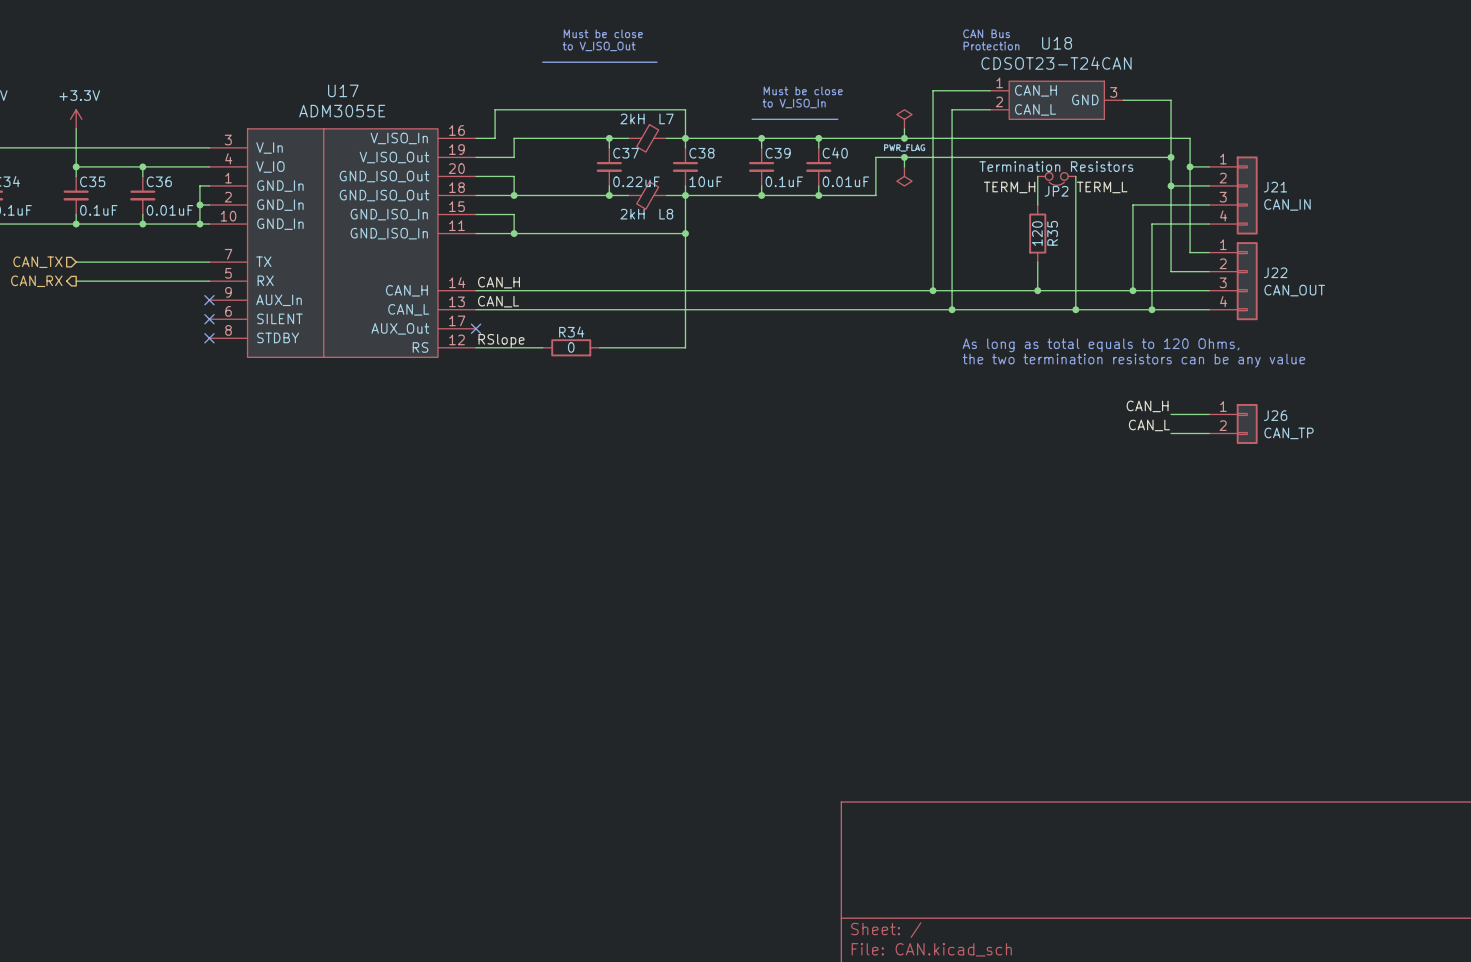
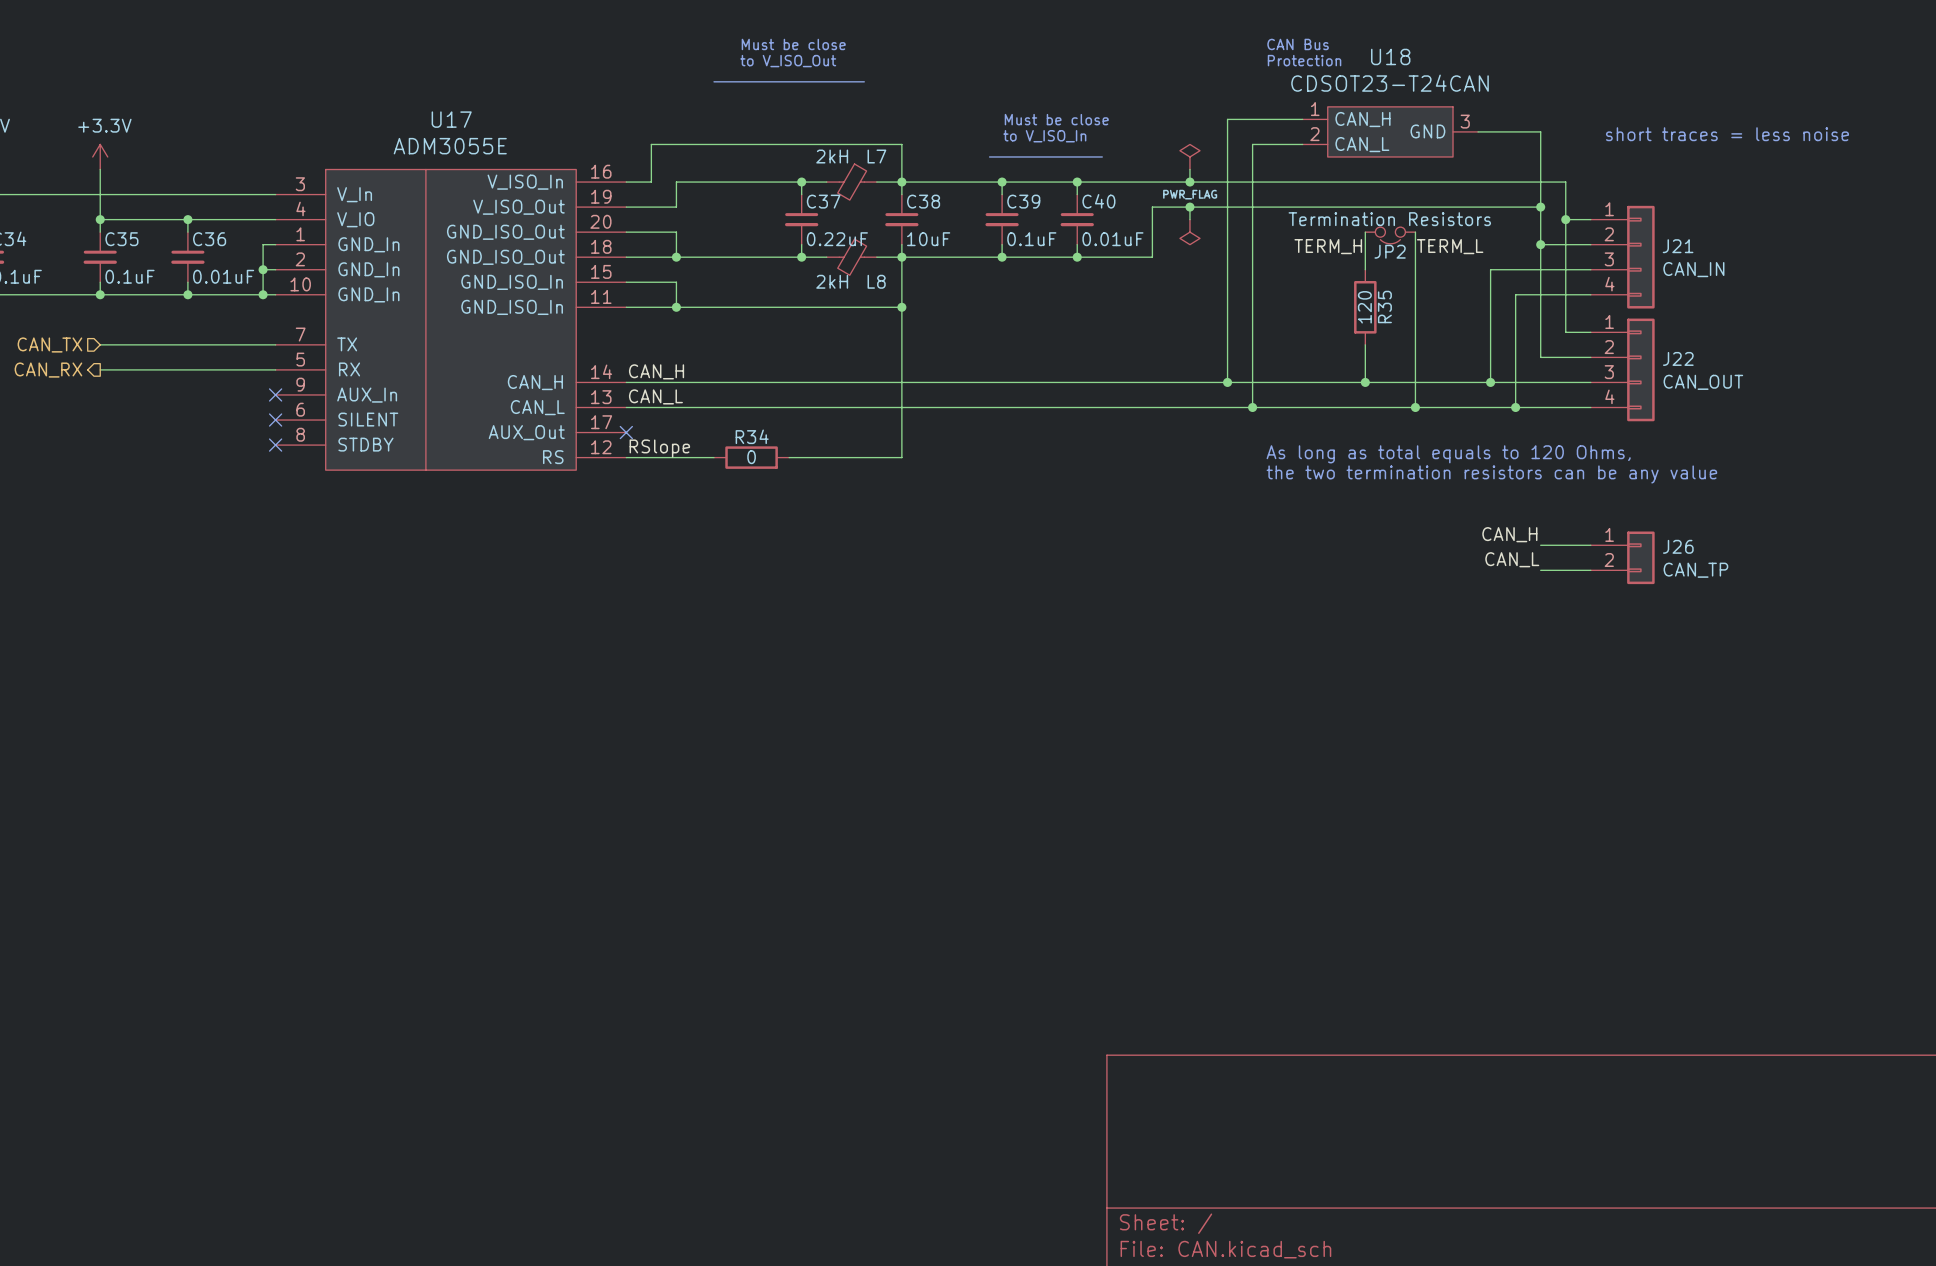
text: none -> short traces = less noise (1727, 134)

